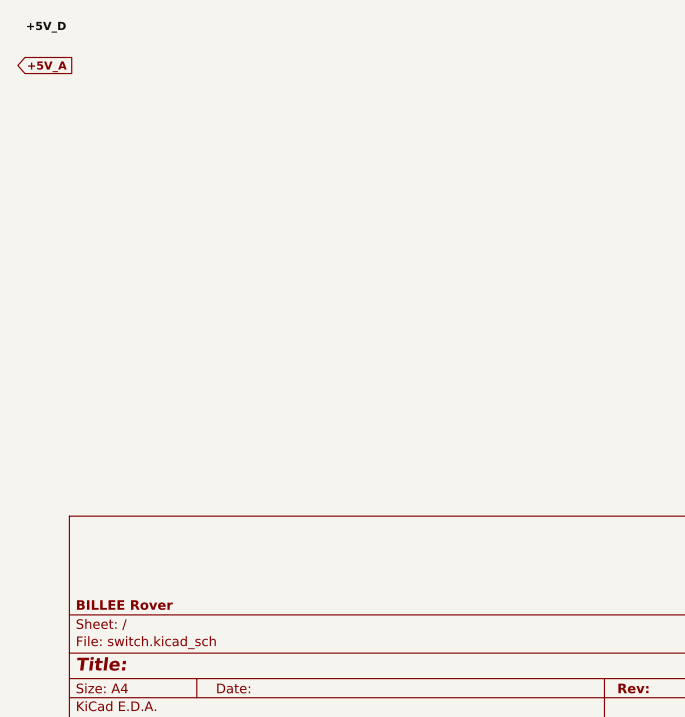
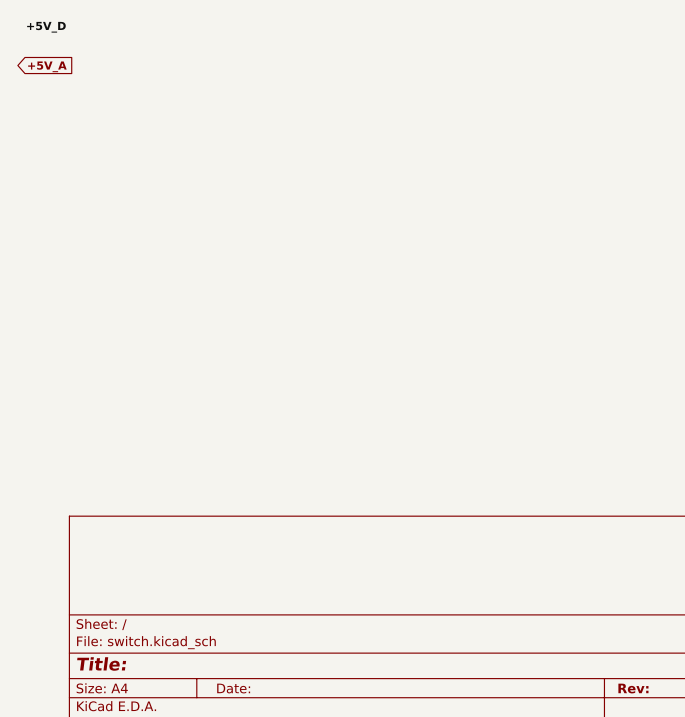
title block: BILLEE Rover (124, 605) -> none

